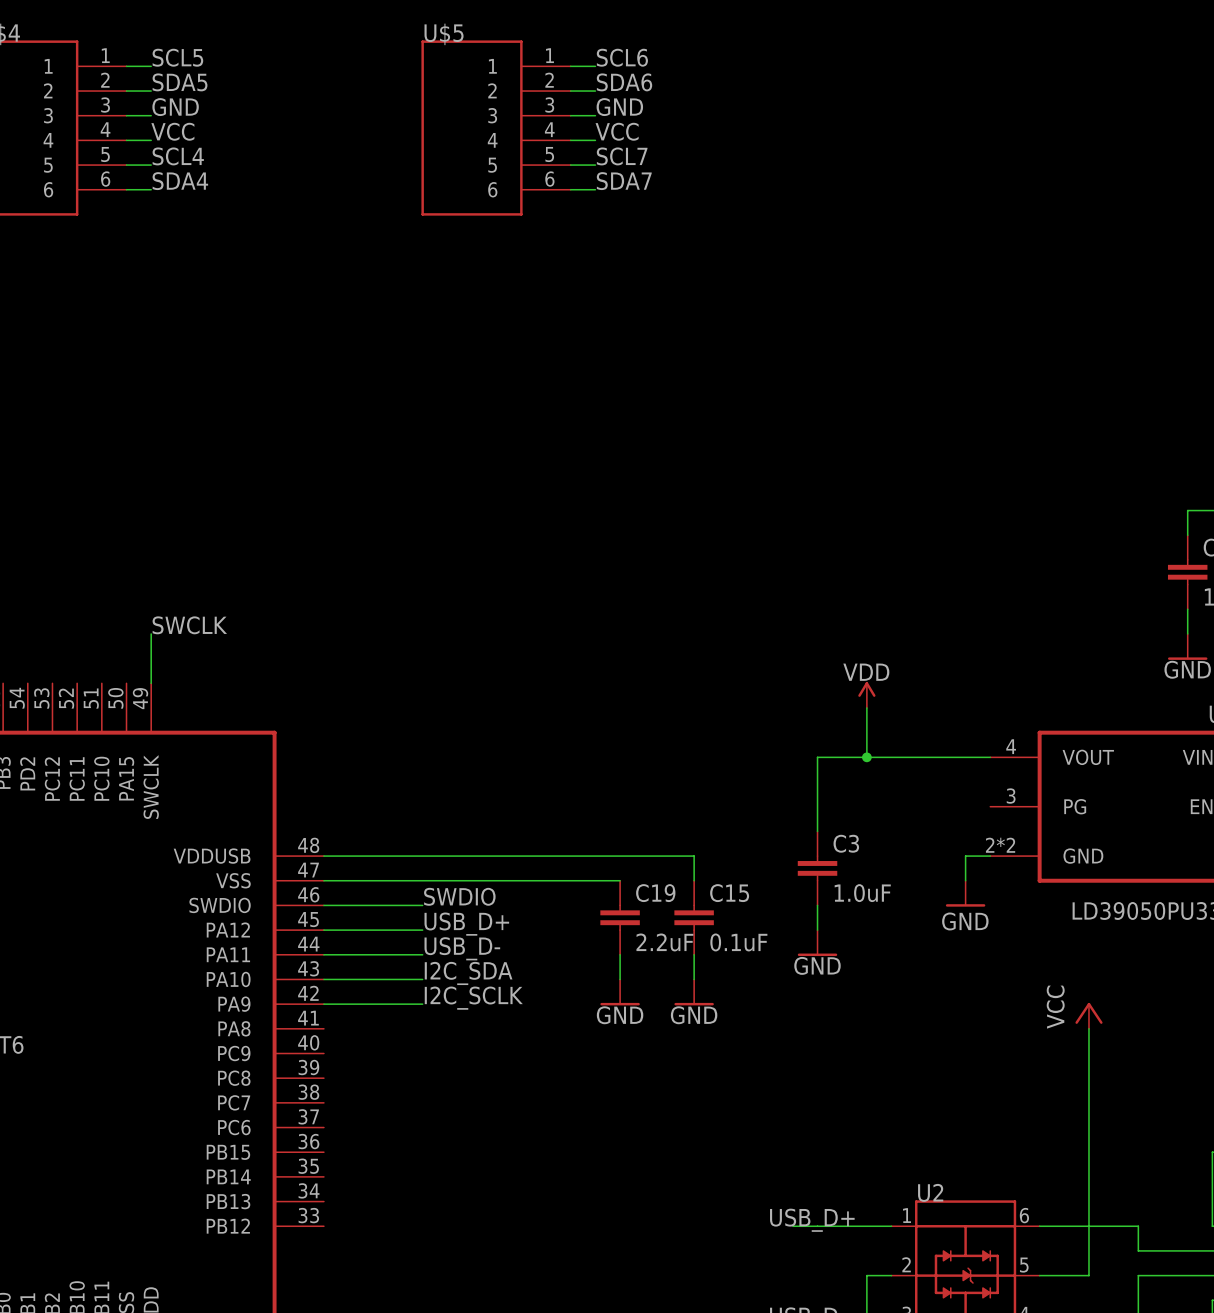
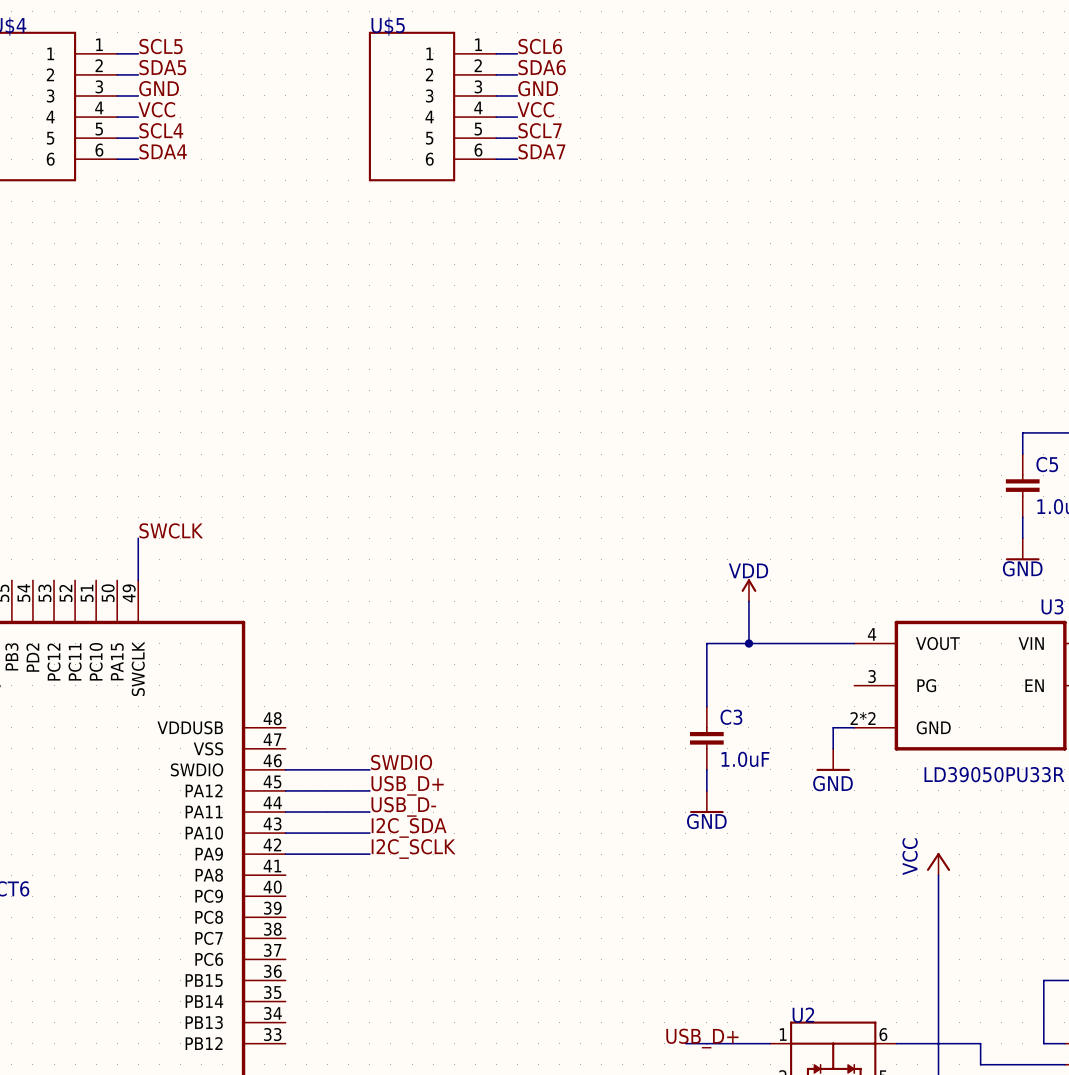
wire: (323, 856) (694, 856) (694, 880) -> none
wire: (323, 880) (620, 880) -> none
C19: 2.2uF (620, 917) -> none
C15: 0.1uF (694, 917) -> none
wire: (620, 954) (620, 979) -> none
wire: (694, 954) (694, 979) -> none
power symbol: GND (620, 992) -> none
power symbol: GND (694, 992) -> none

